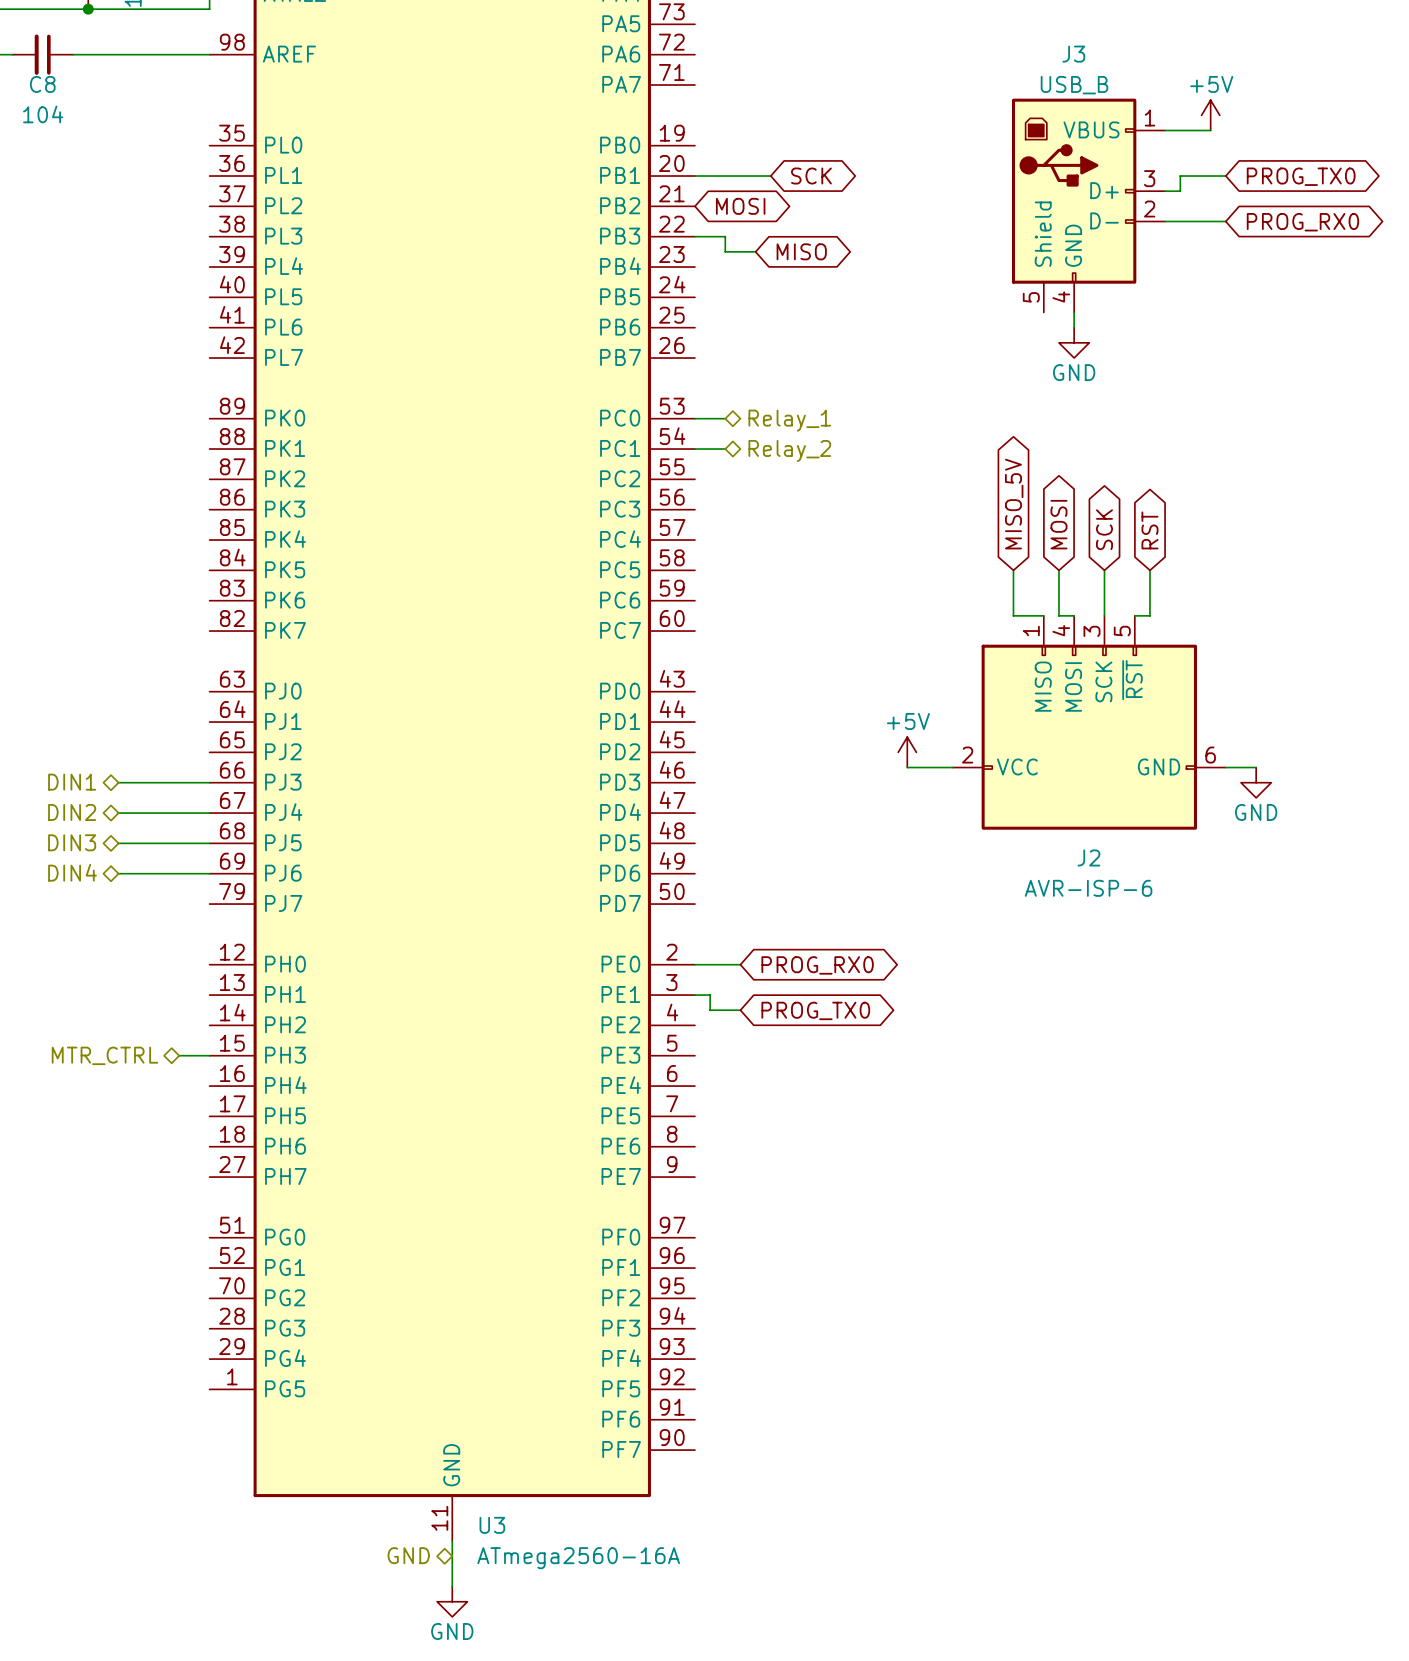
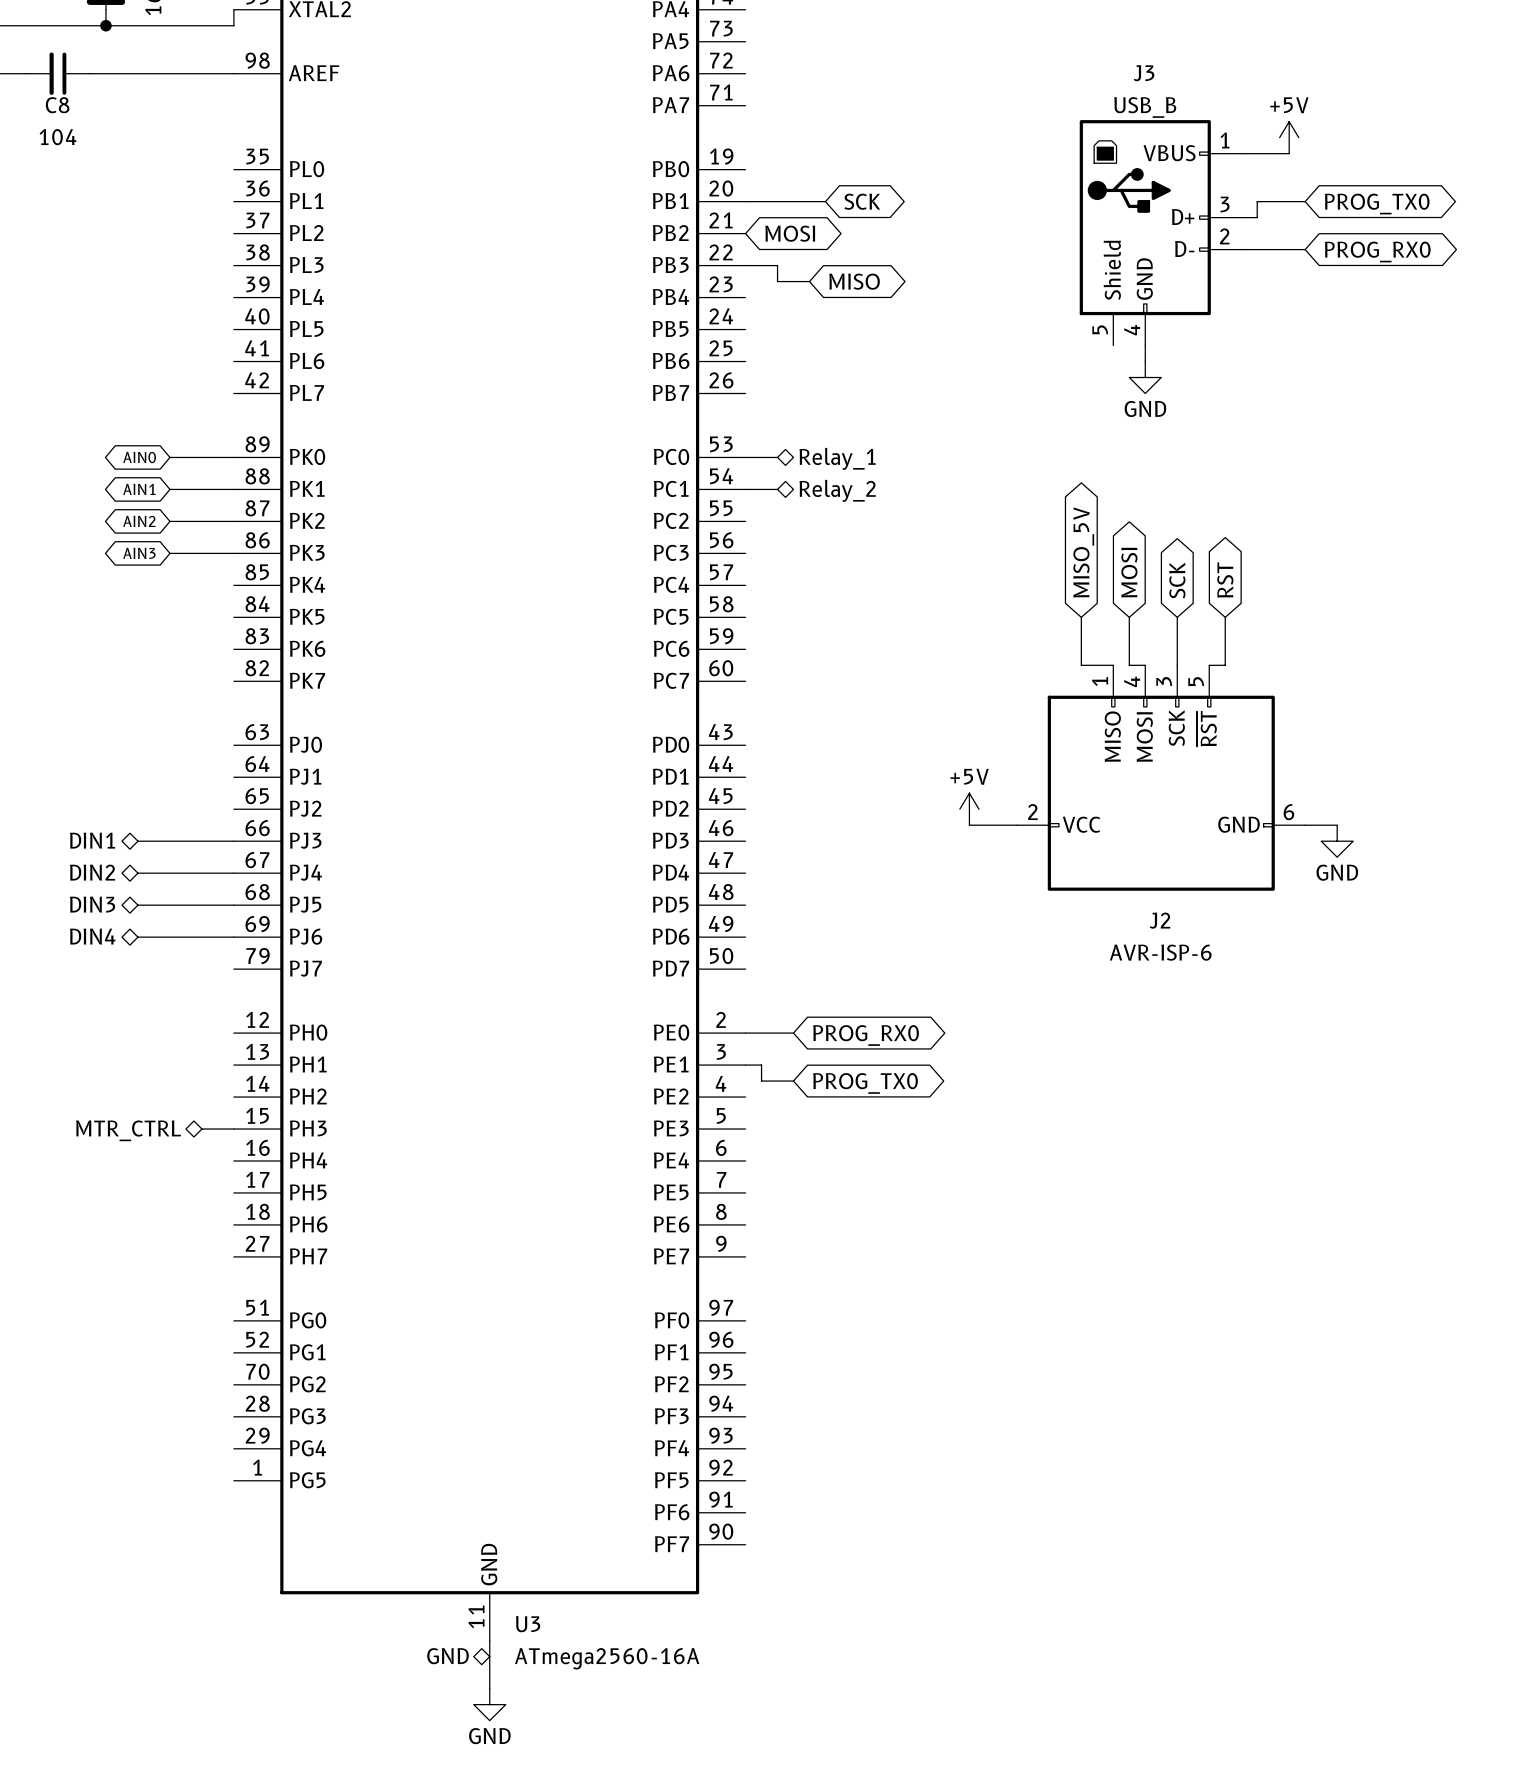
global label: none -> AIN0 (139, 457)
wire: none -> (169, 457) (233, 457)
global label: none -> AIN1 (139, 489)
wire: none -> (169, 489) (233, 489)
global label: none -> AIN2 (139, 521)
wire: none -> (169, 521) (233, 521)
global label: none -> AIN3 (139, 553)
wire: none -> (169, 553) (233, 553)

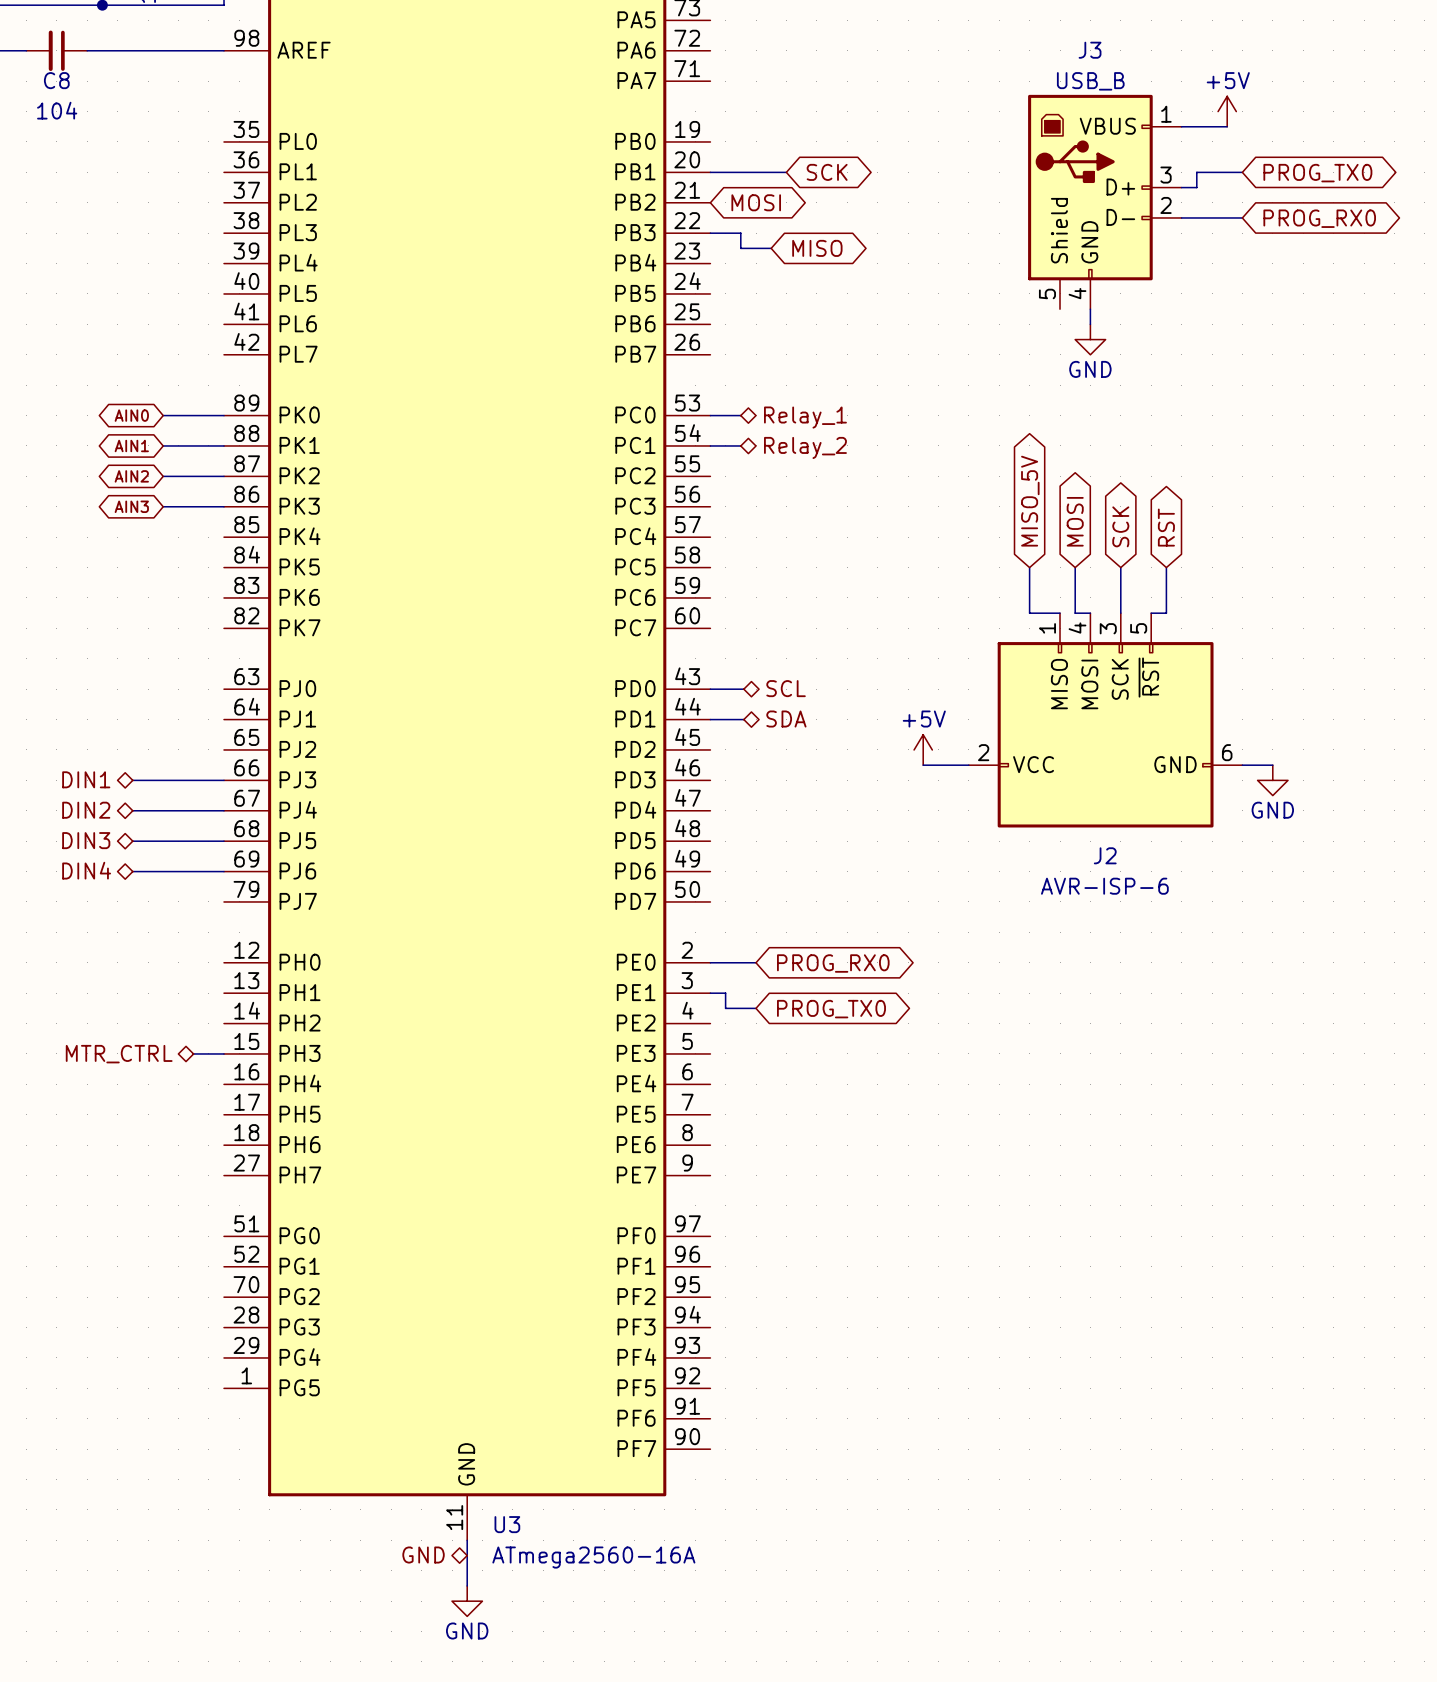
hierarchical label: none -> SCL (786, 688)
wire: none -> (710, 689) (743, 689)
hierarchical label: none -> SDA (786, 719)
wire: none -> (710, 719) (743, 719)

